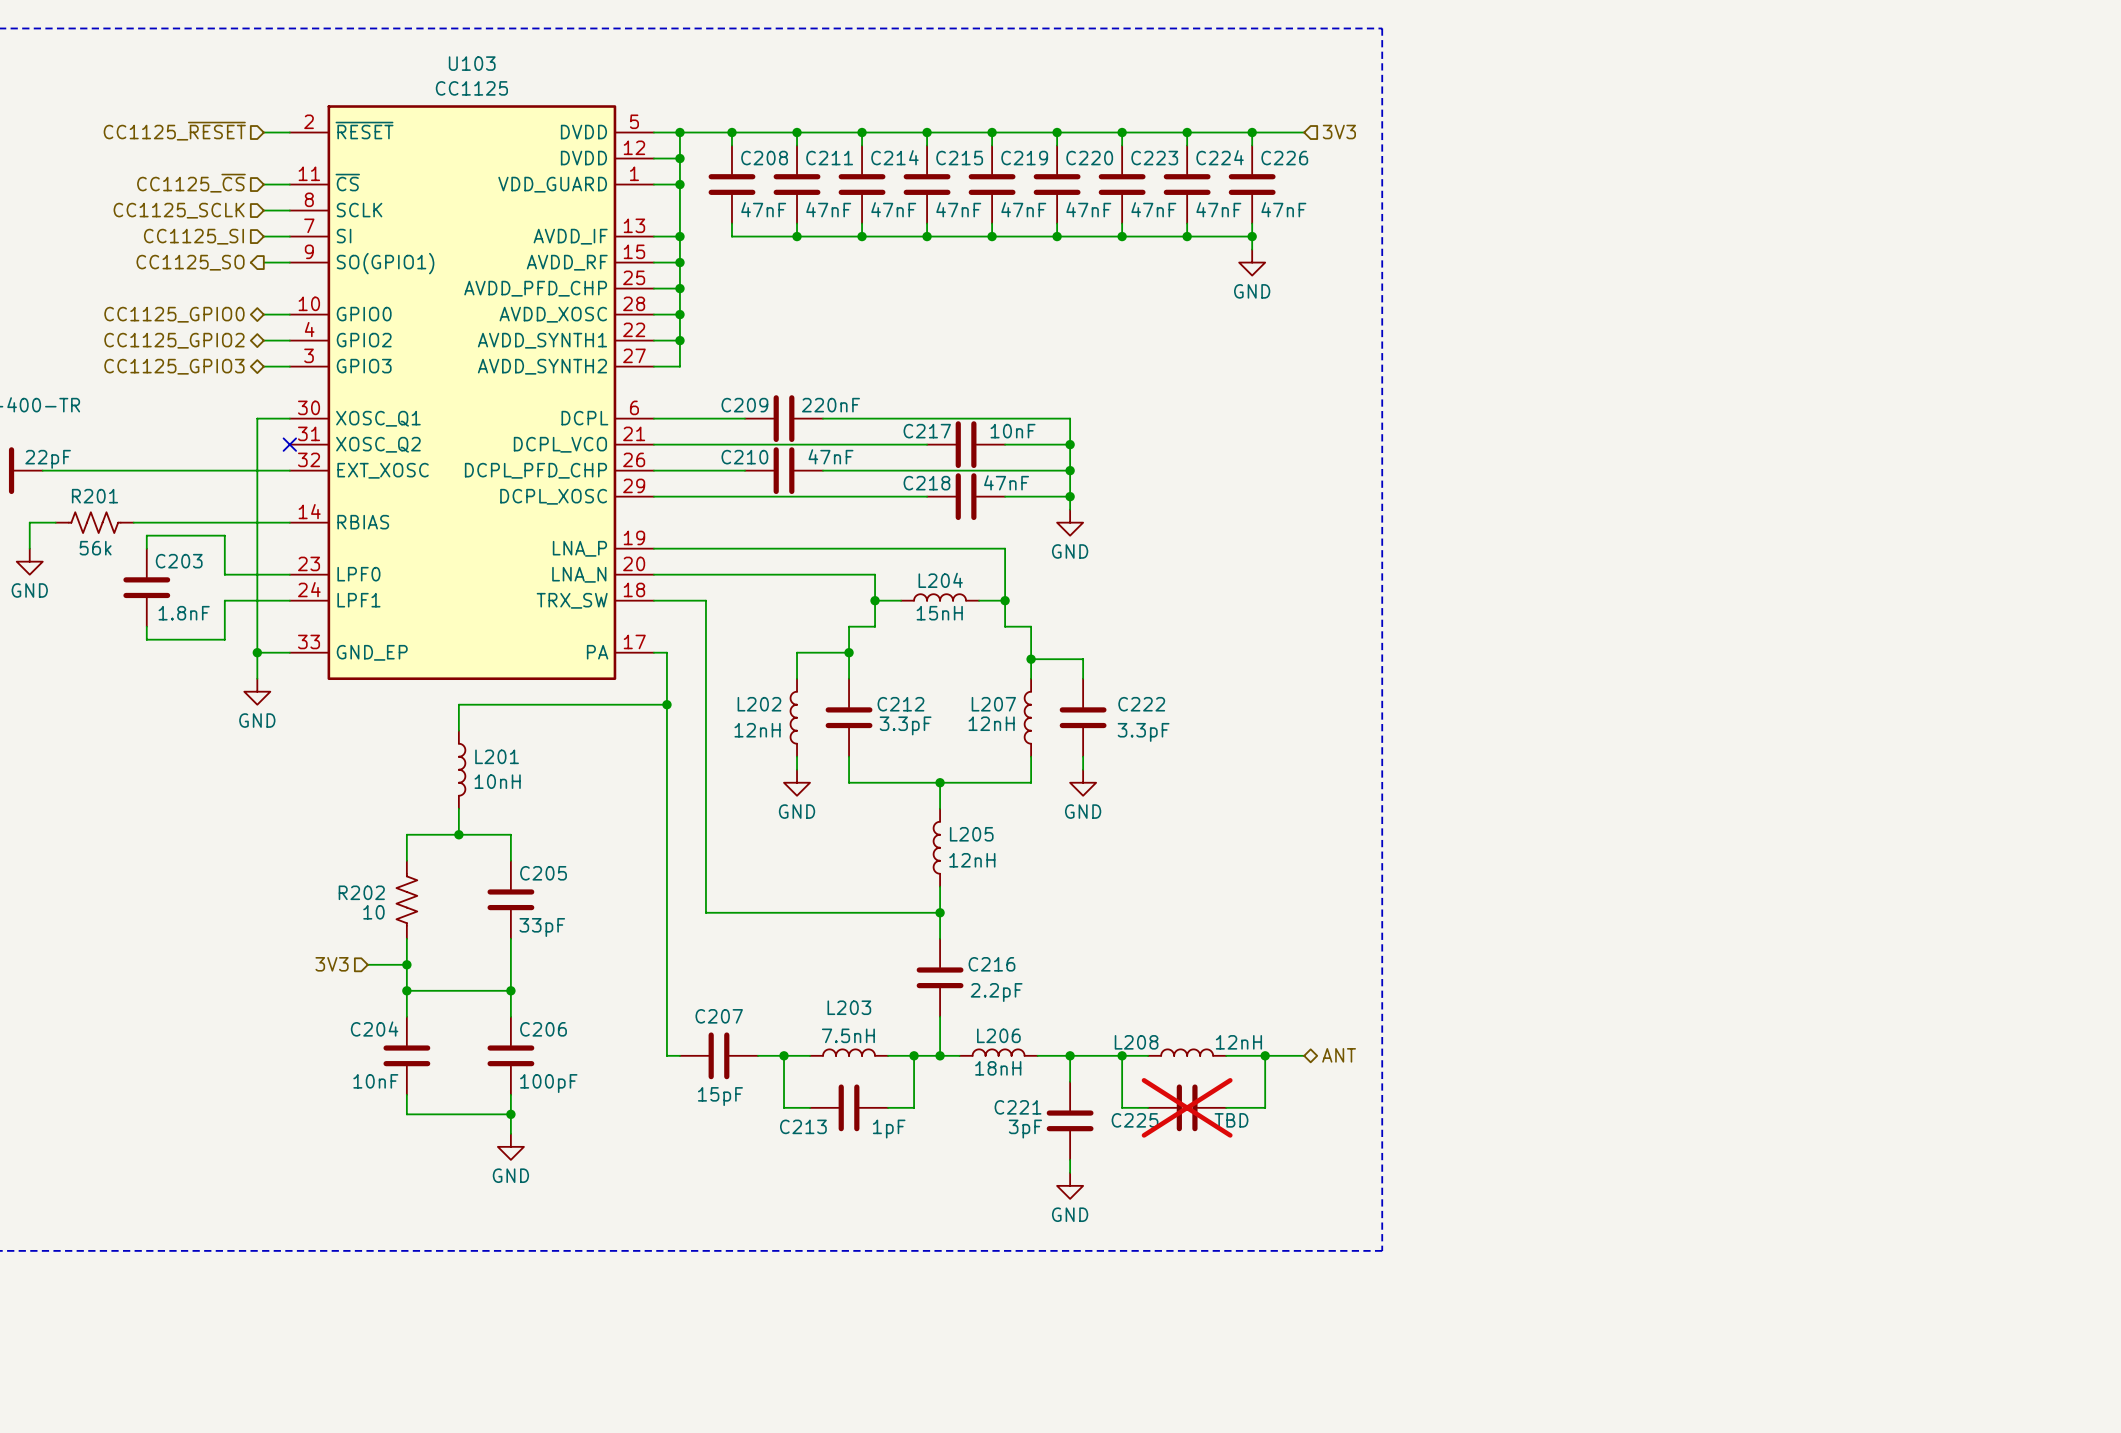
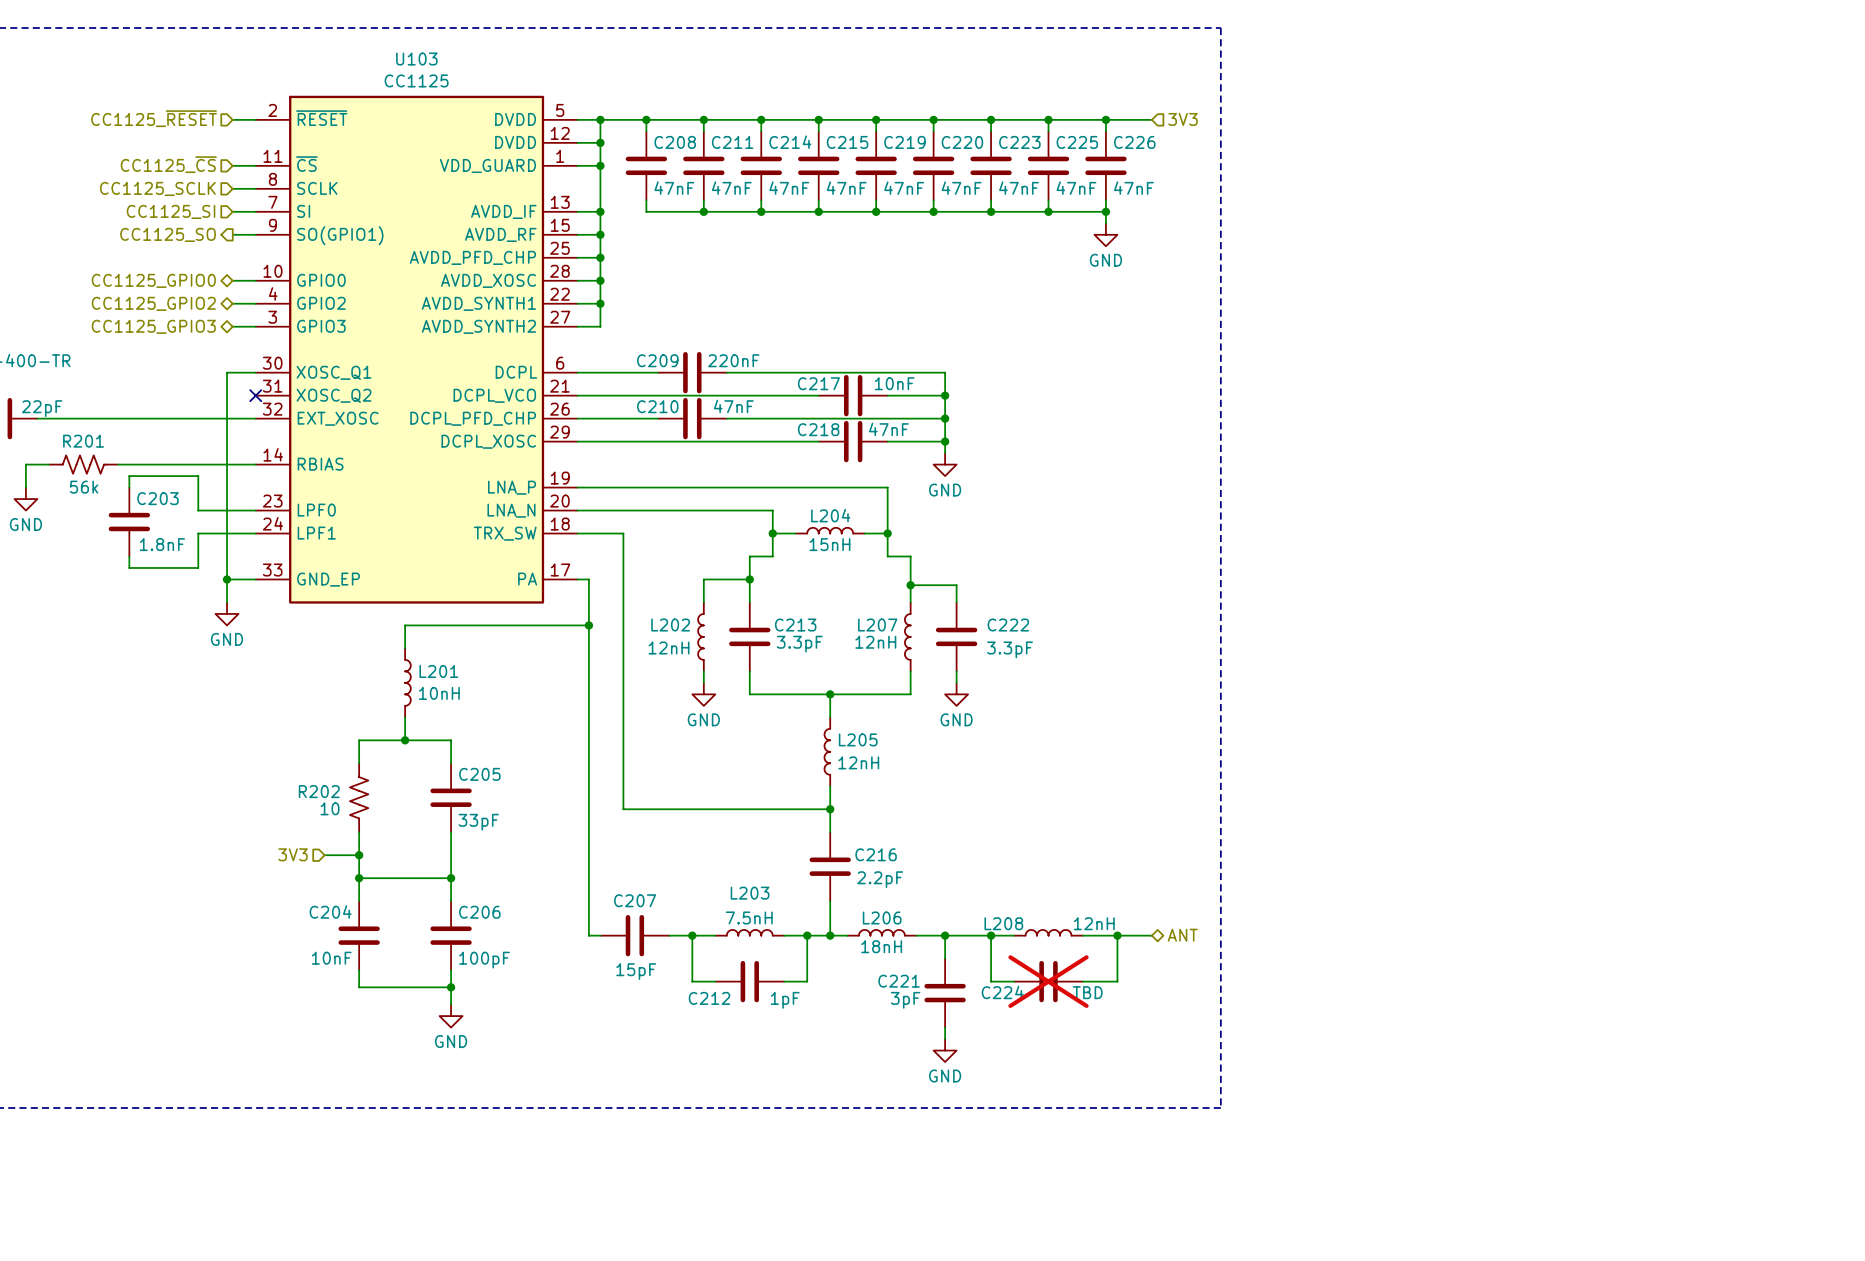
C224 name: C224 (1220, 157) -> C225 (1077, 142)
C212 name: C212 (900, 704) -> C213 (795, 625)
C225 name: C225 (1135, 1120) -> C224 (1002, 992)
C213 name: C213 (803, 1126) -> C212 (709, 998)

